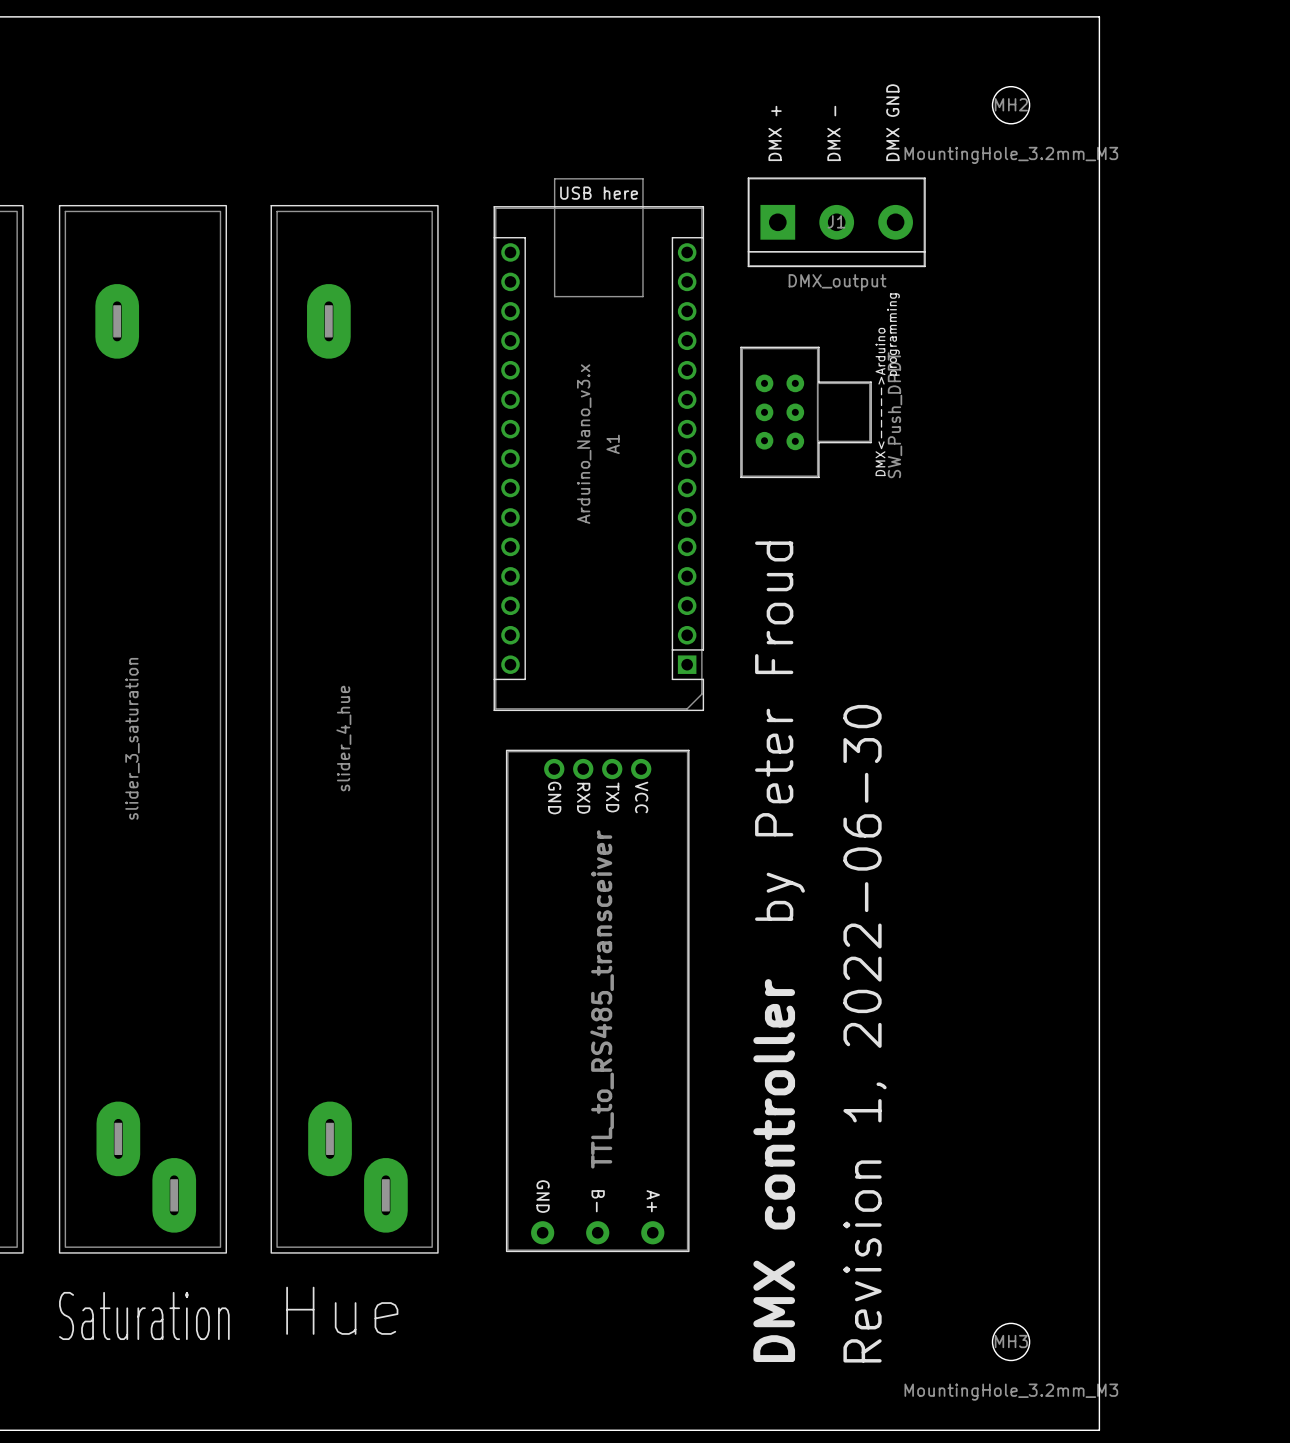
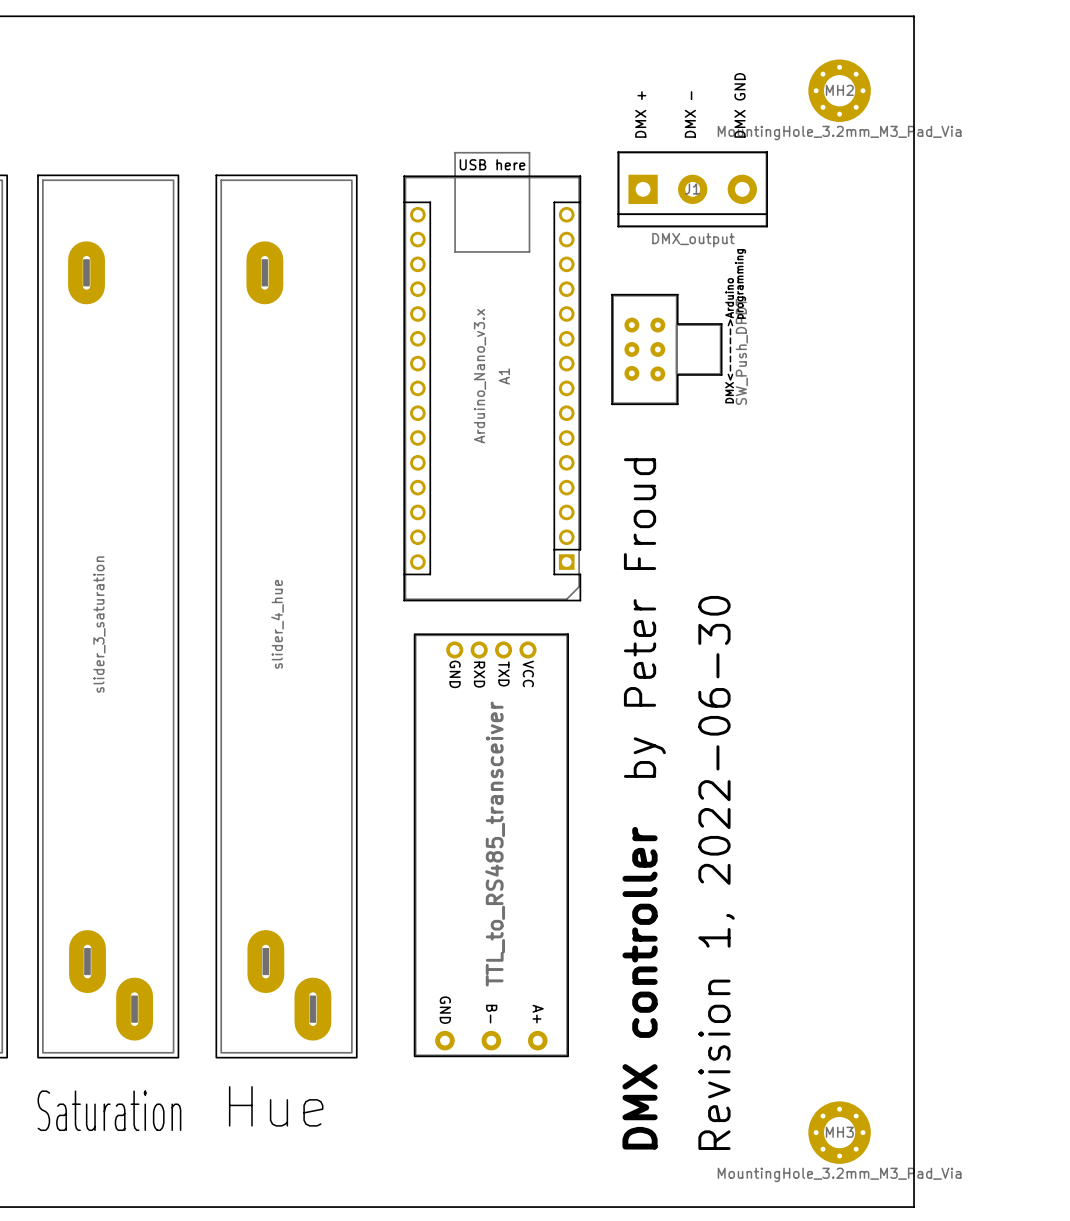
MH2 footprint: [992, 86, 1030, 124] -> [808, 59, 871, 122]
MH2 value: MountingHole_3.2mm_M3 (1011, 155) -> MountingHole_3.2mm_M3_Pad_Via (839, 133)
MH3 footprint: [992, 1323, 1030, 1361] -> [808, 1101, 871, 1164]
MH3 value: MountingHole_3.2mm_M3 (1011, 1392) -> MountingHole_3.2mm_M3_Pad_Via (839, 1174)

